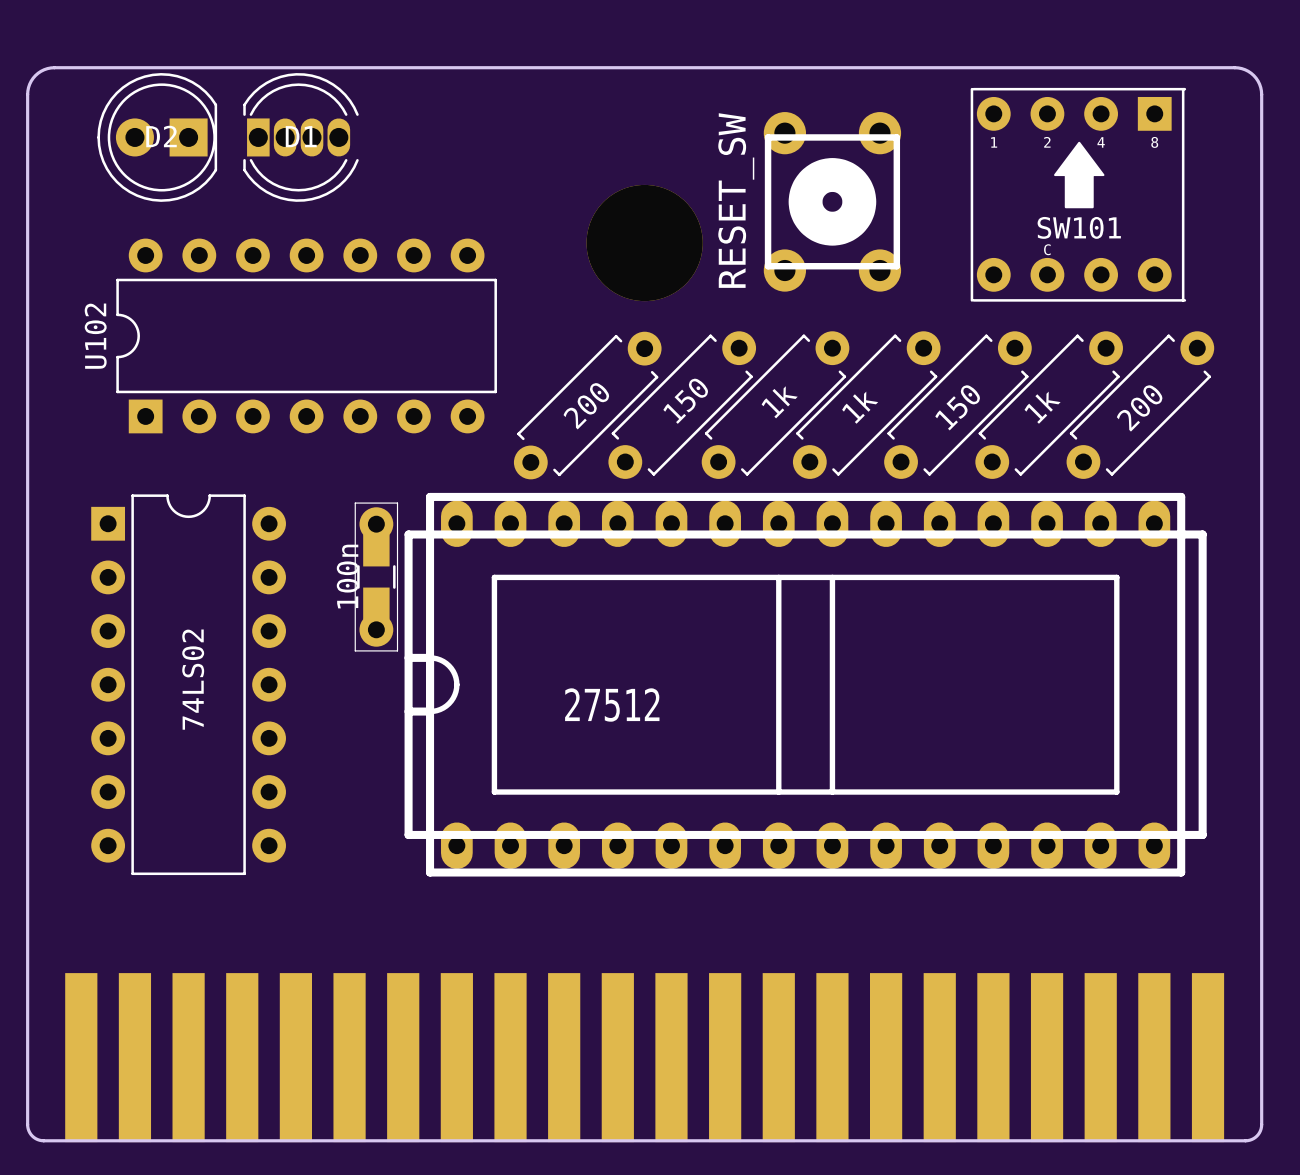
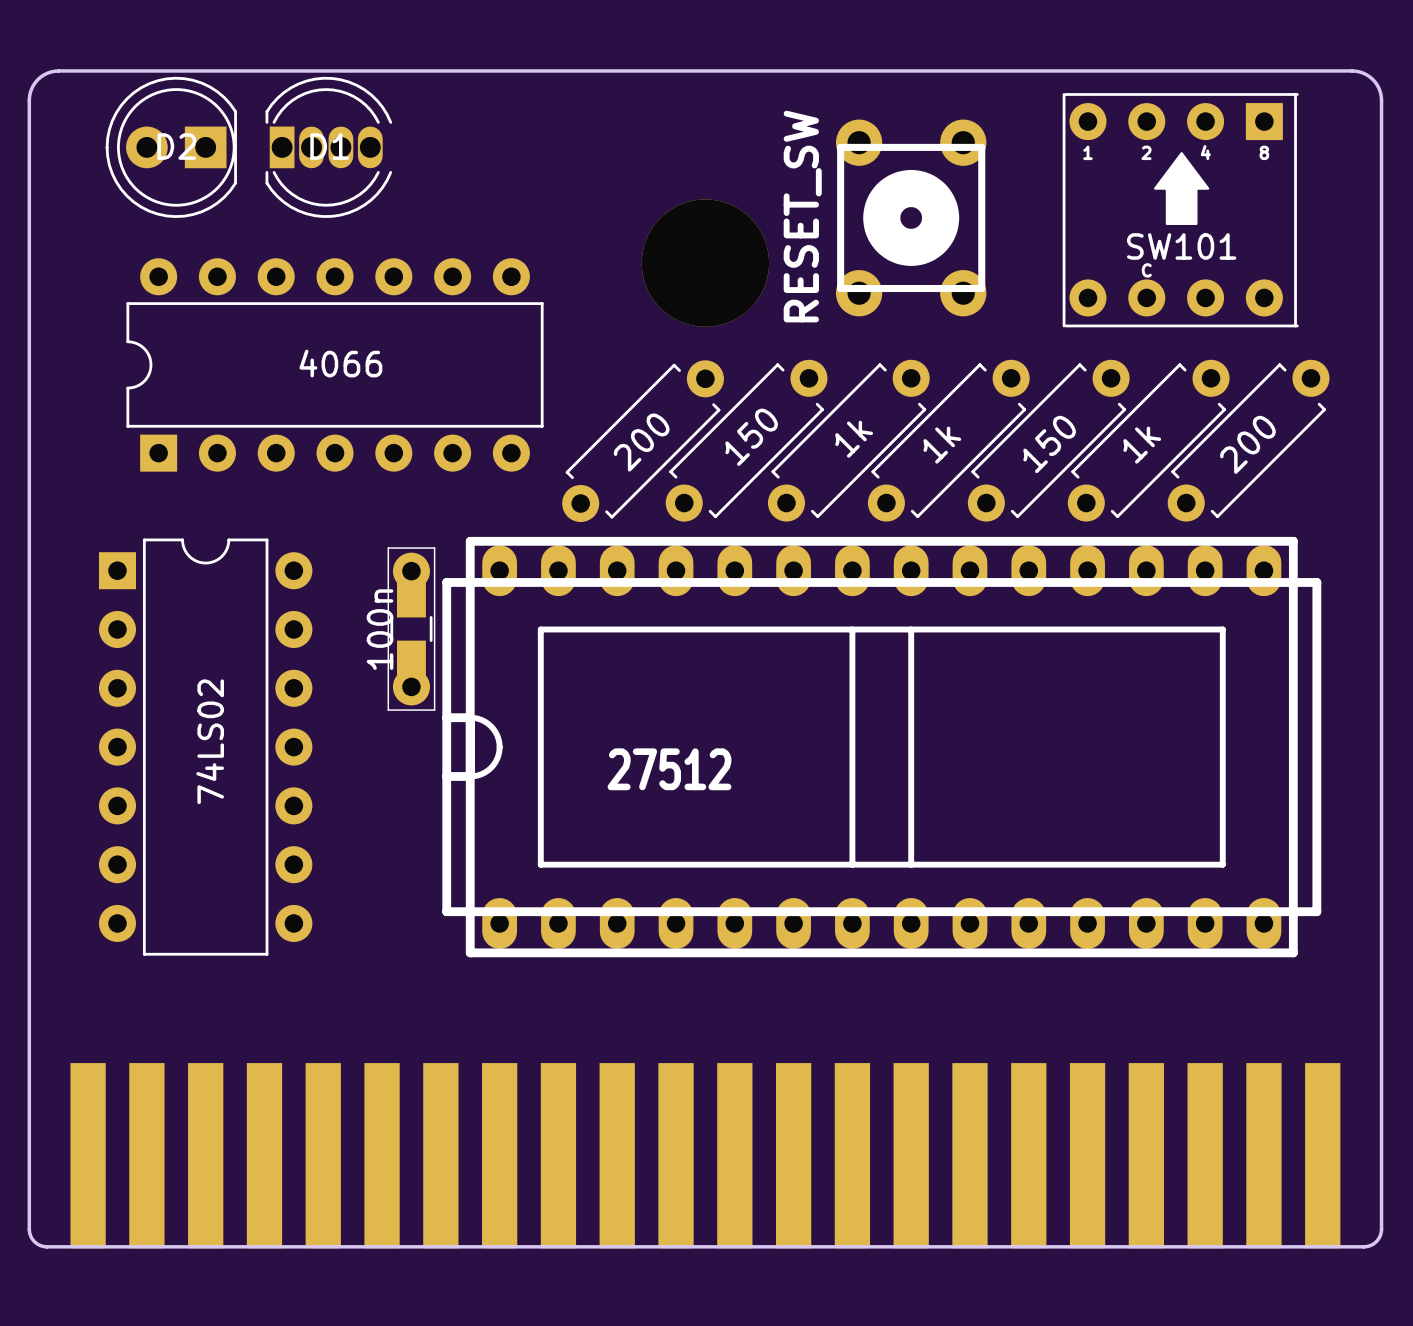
U102 value: none -> 4066 (340, 363)
U102 name: U102 (95, 336) -> none

